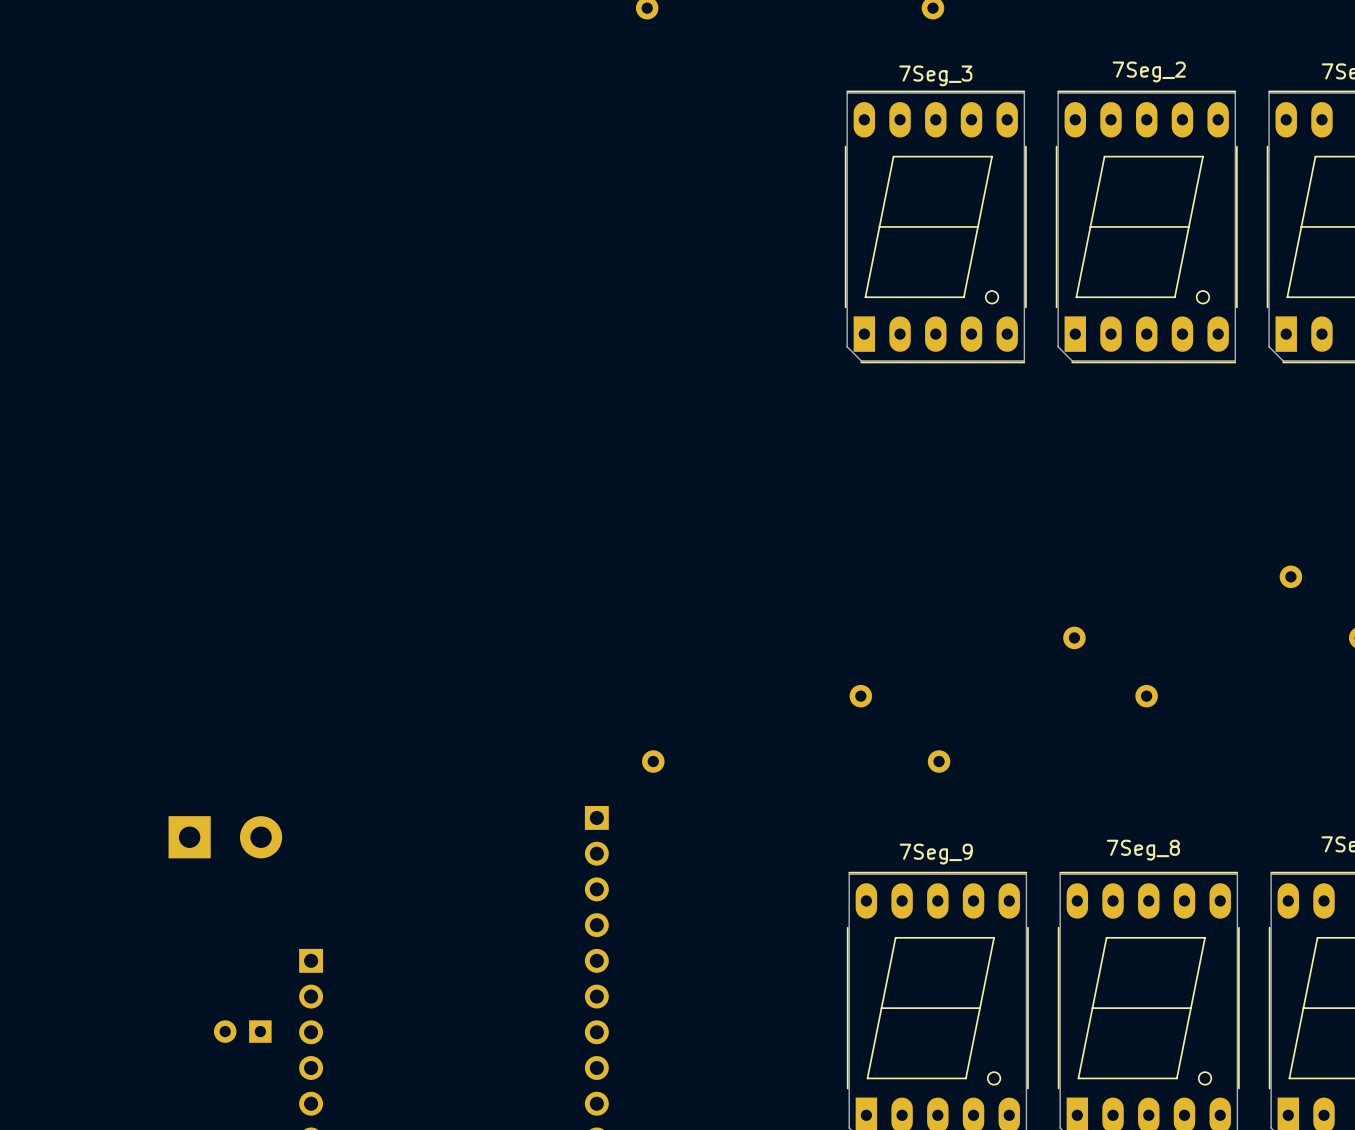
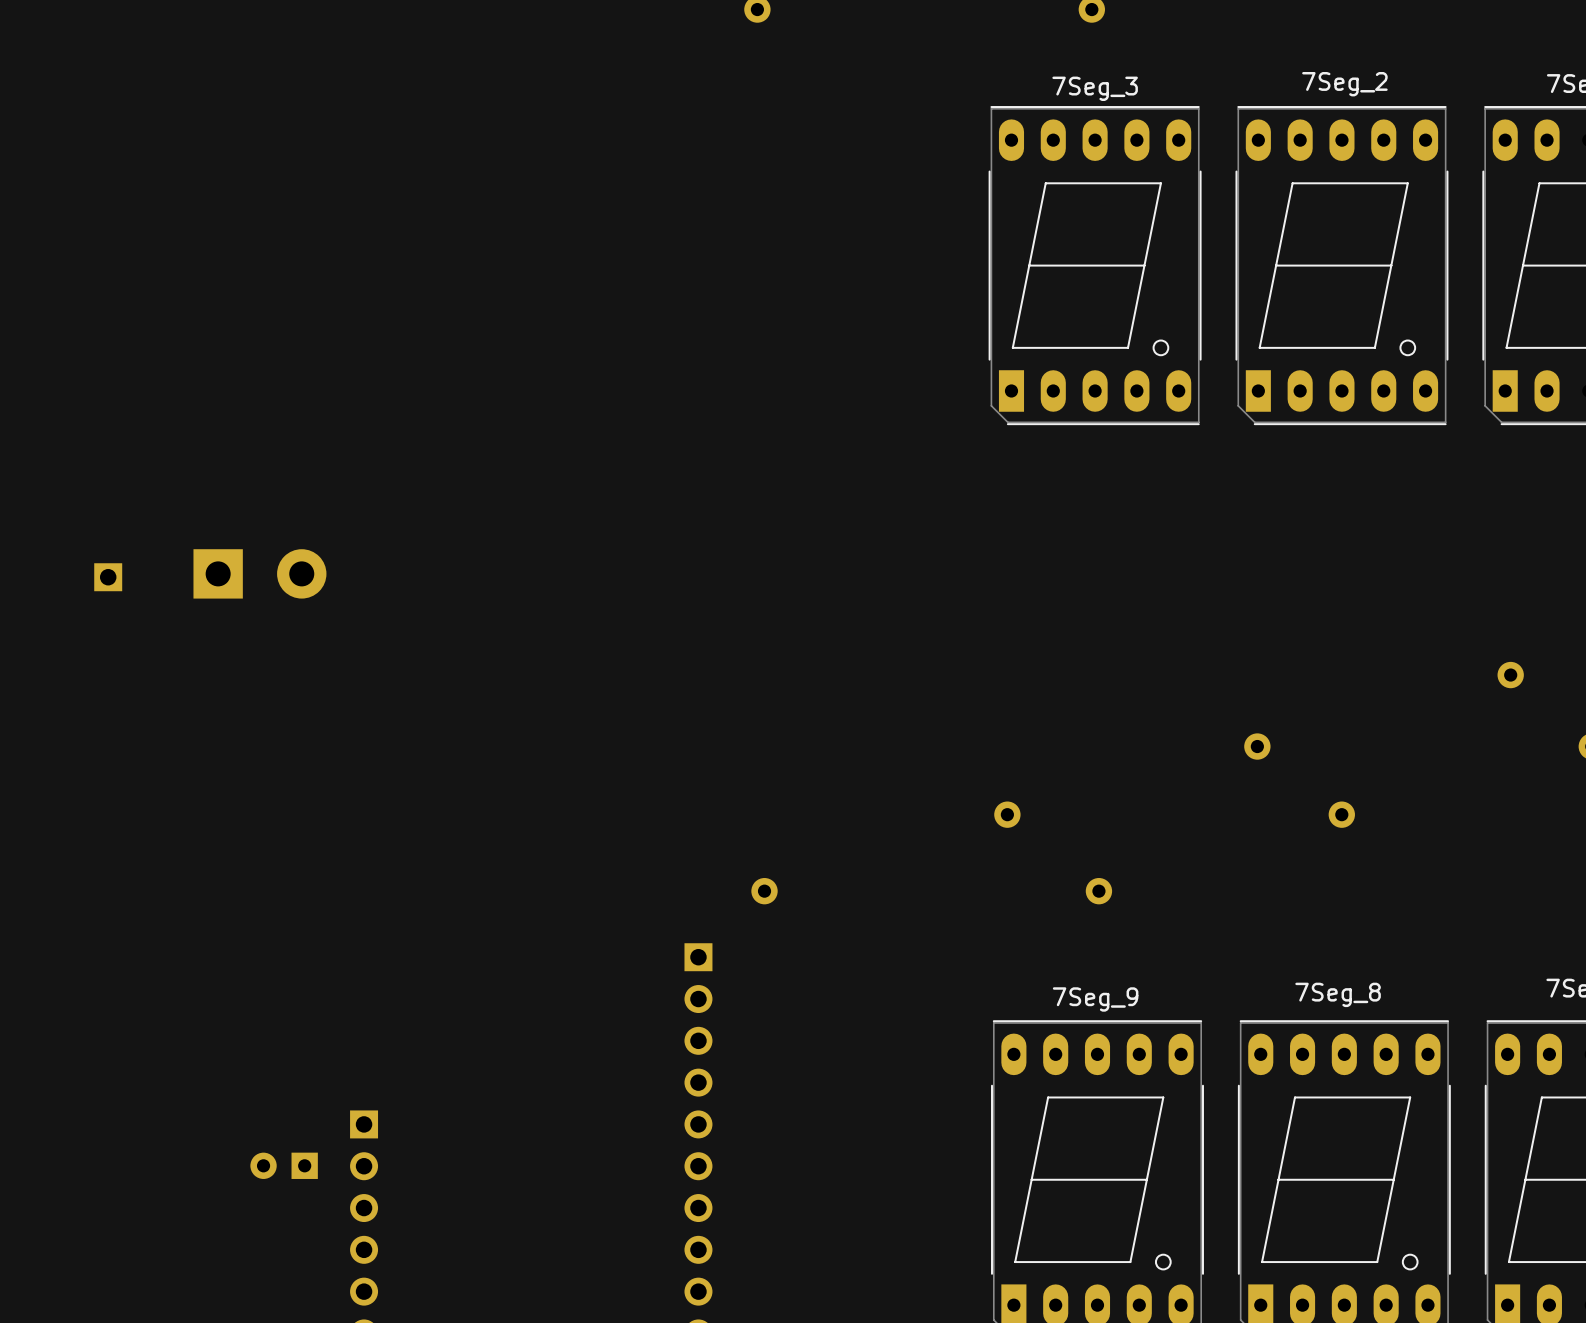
part: none -> (108, 577)
part position: (225, 837) -> (259, 573)
part position: (242, 1031) -> (284, 1165)

